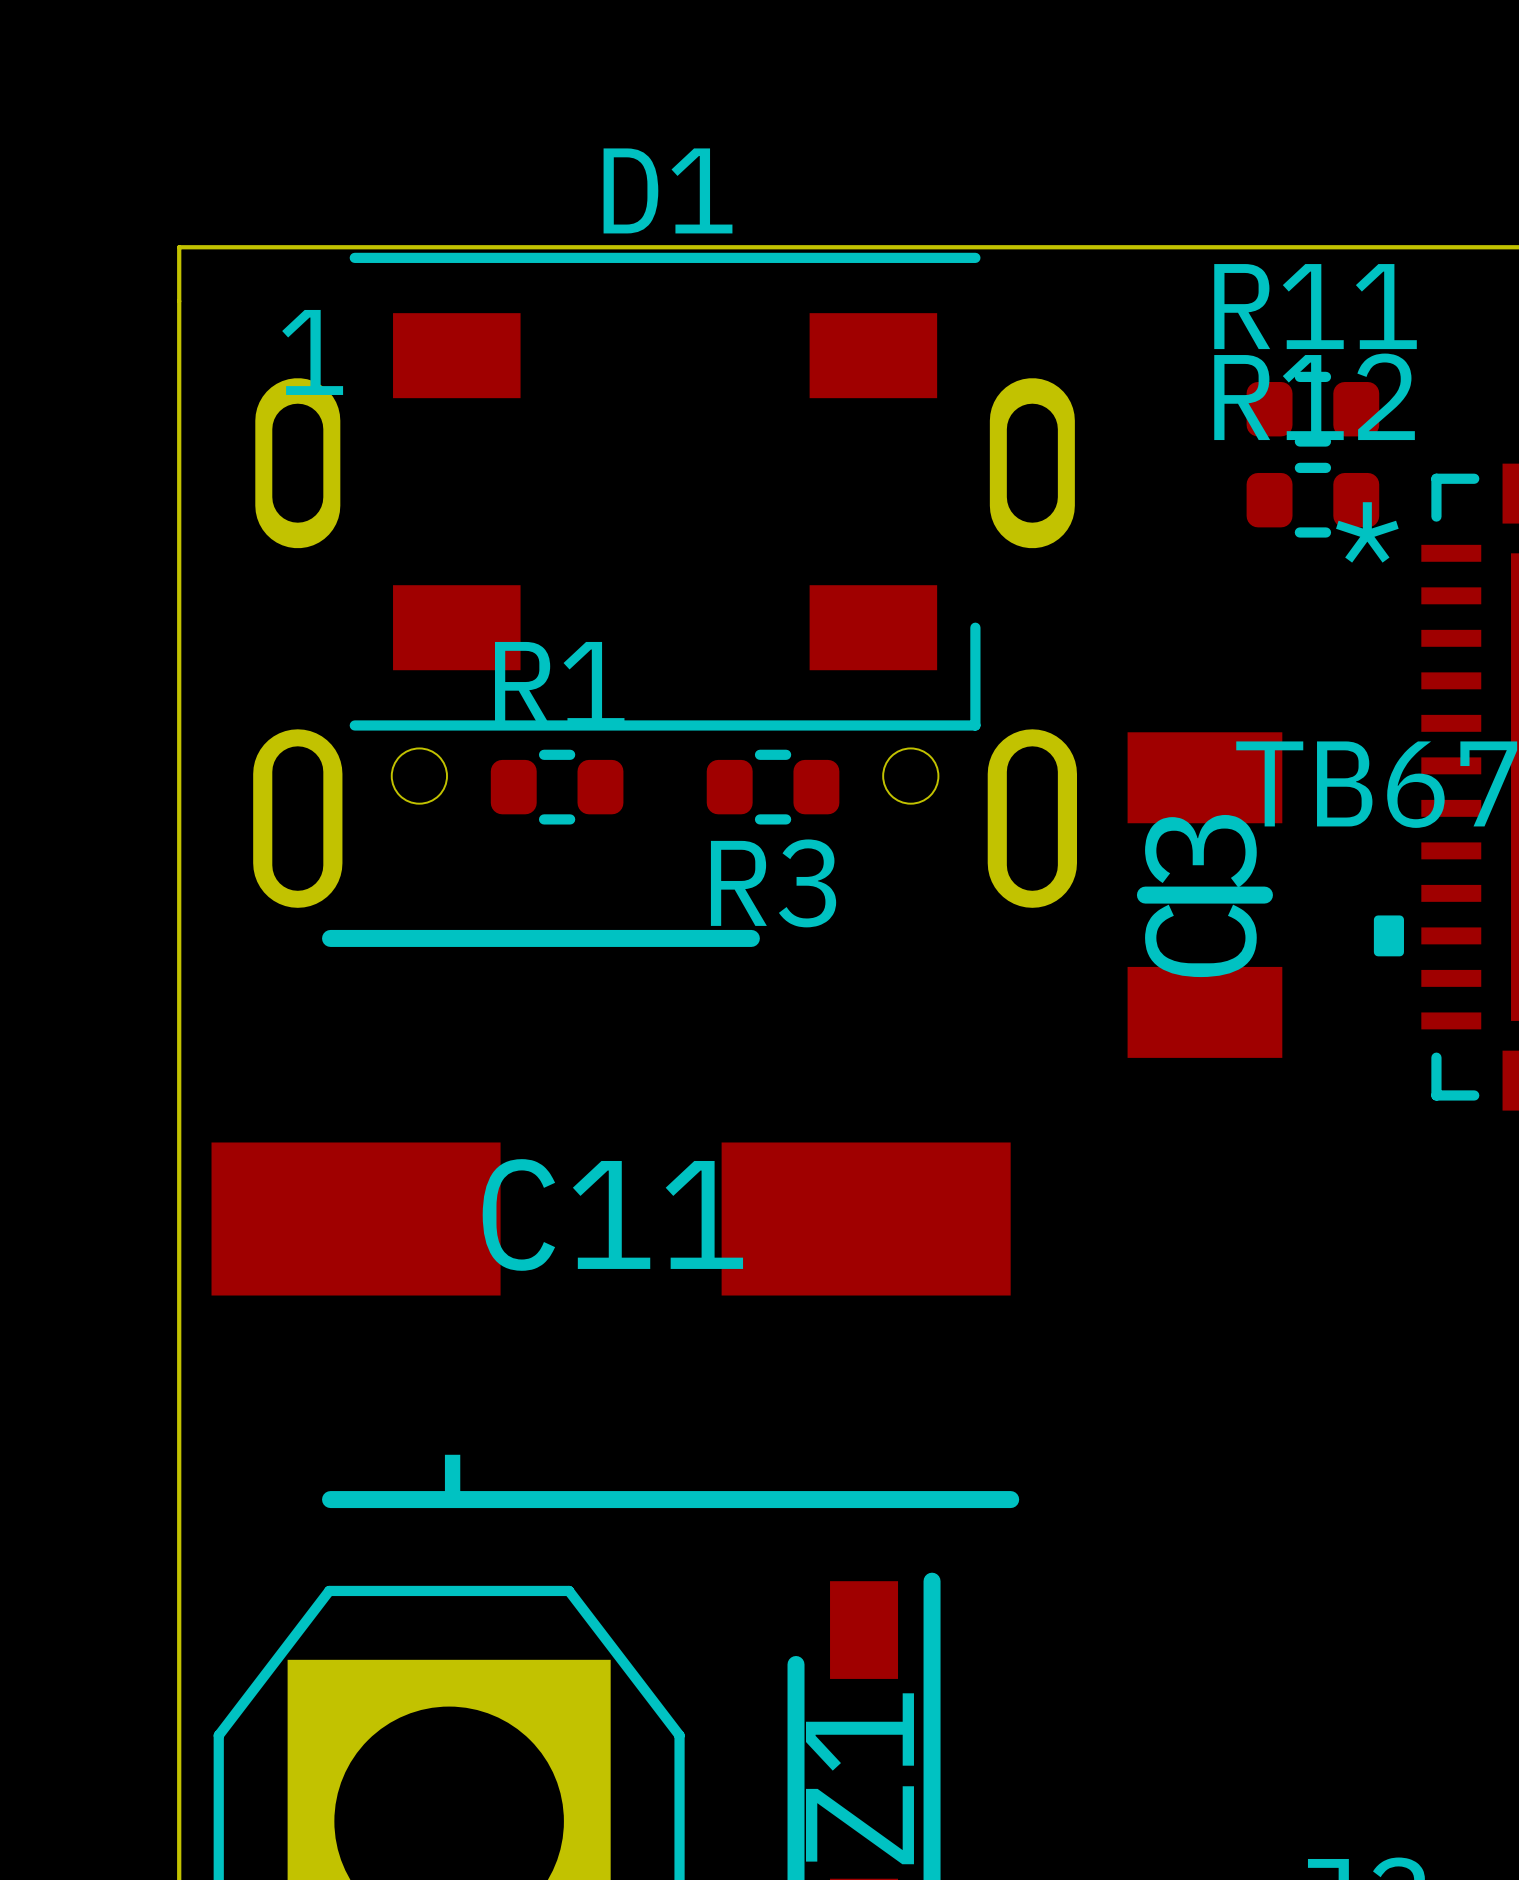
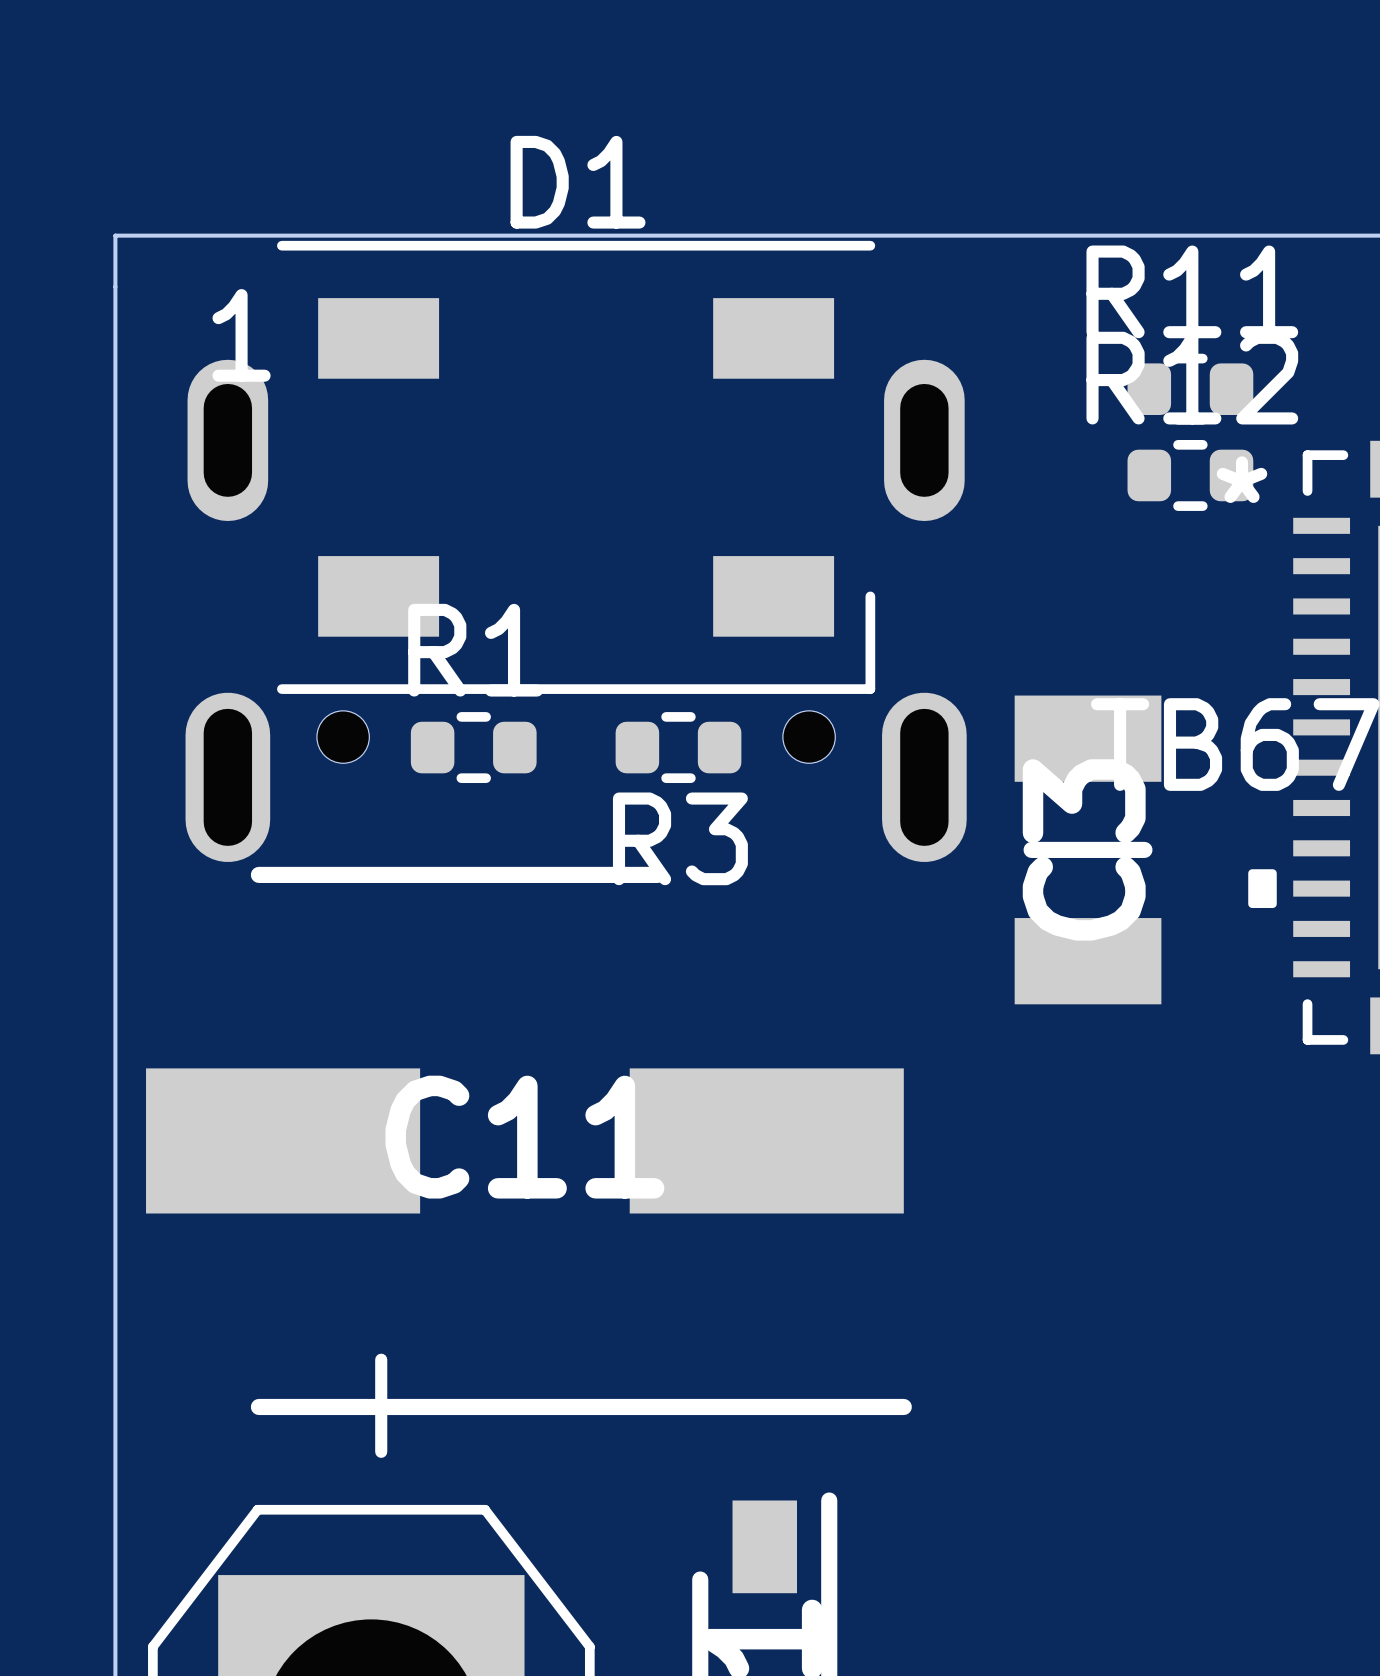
C11 position: (615, 1219) -> (528, 1140)

